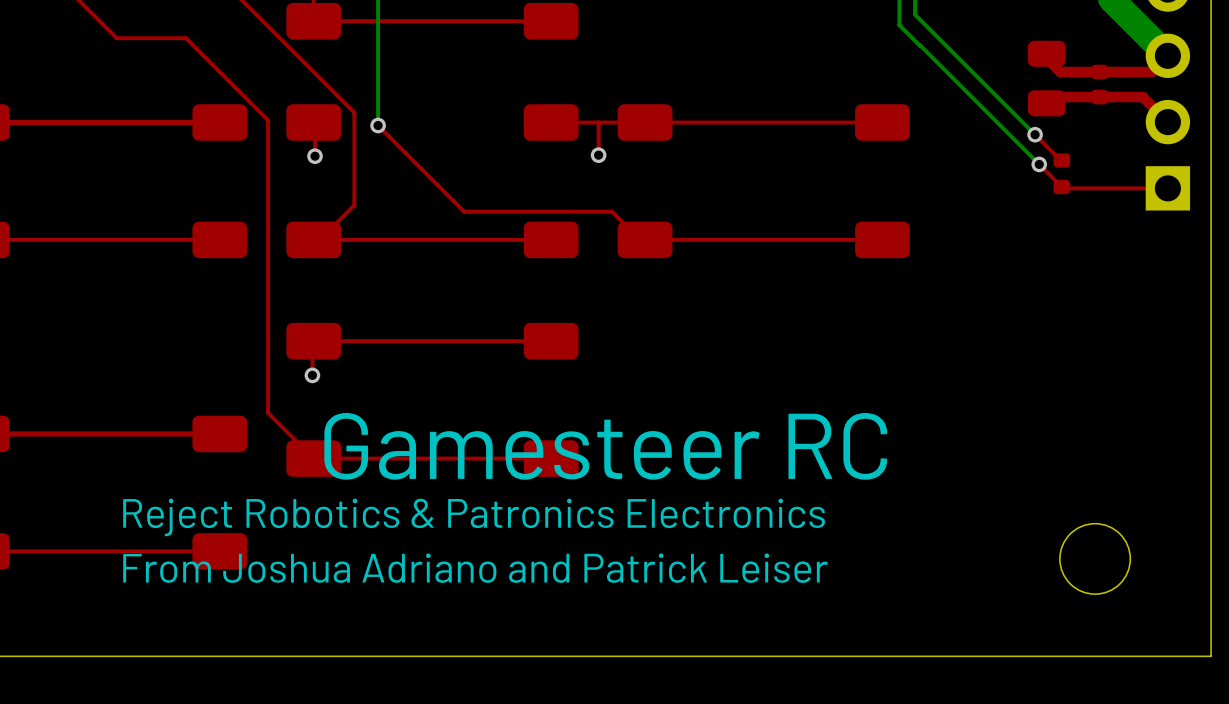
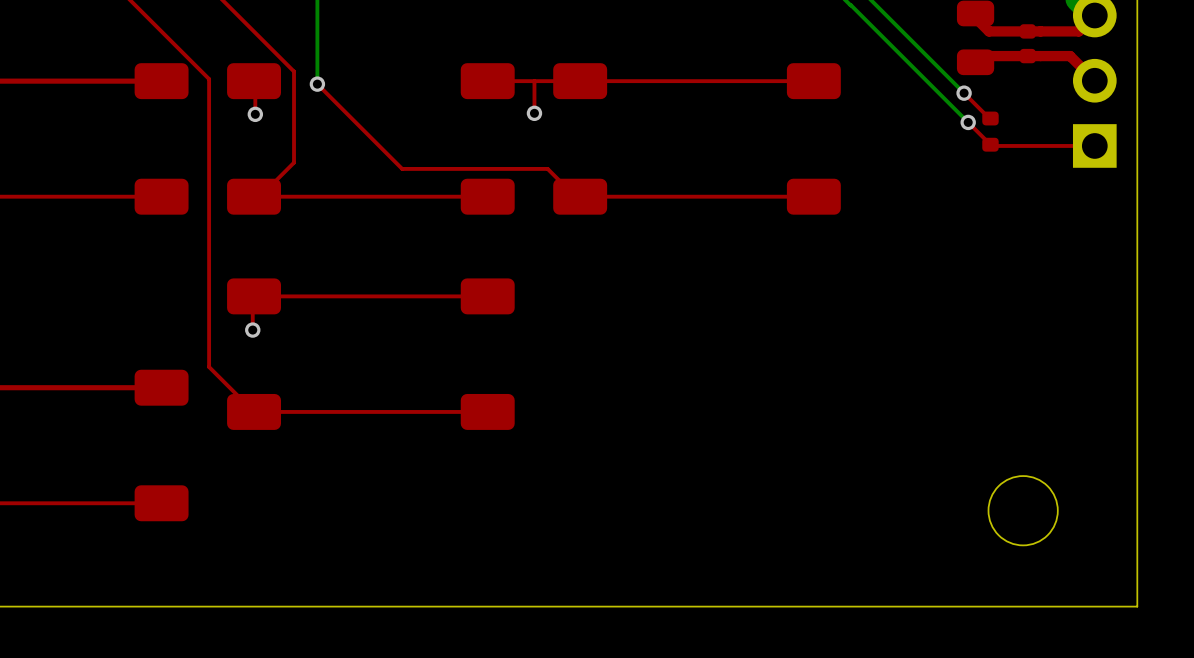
text: Gamesteer RC (605, 446) -> none
text: Reject Robotics & Patronics Electronics (474, 517) -> none
text: From Joshua Adriano and Patrick Leiser (475, 568) -> none

